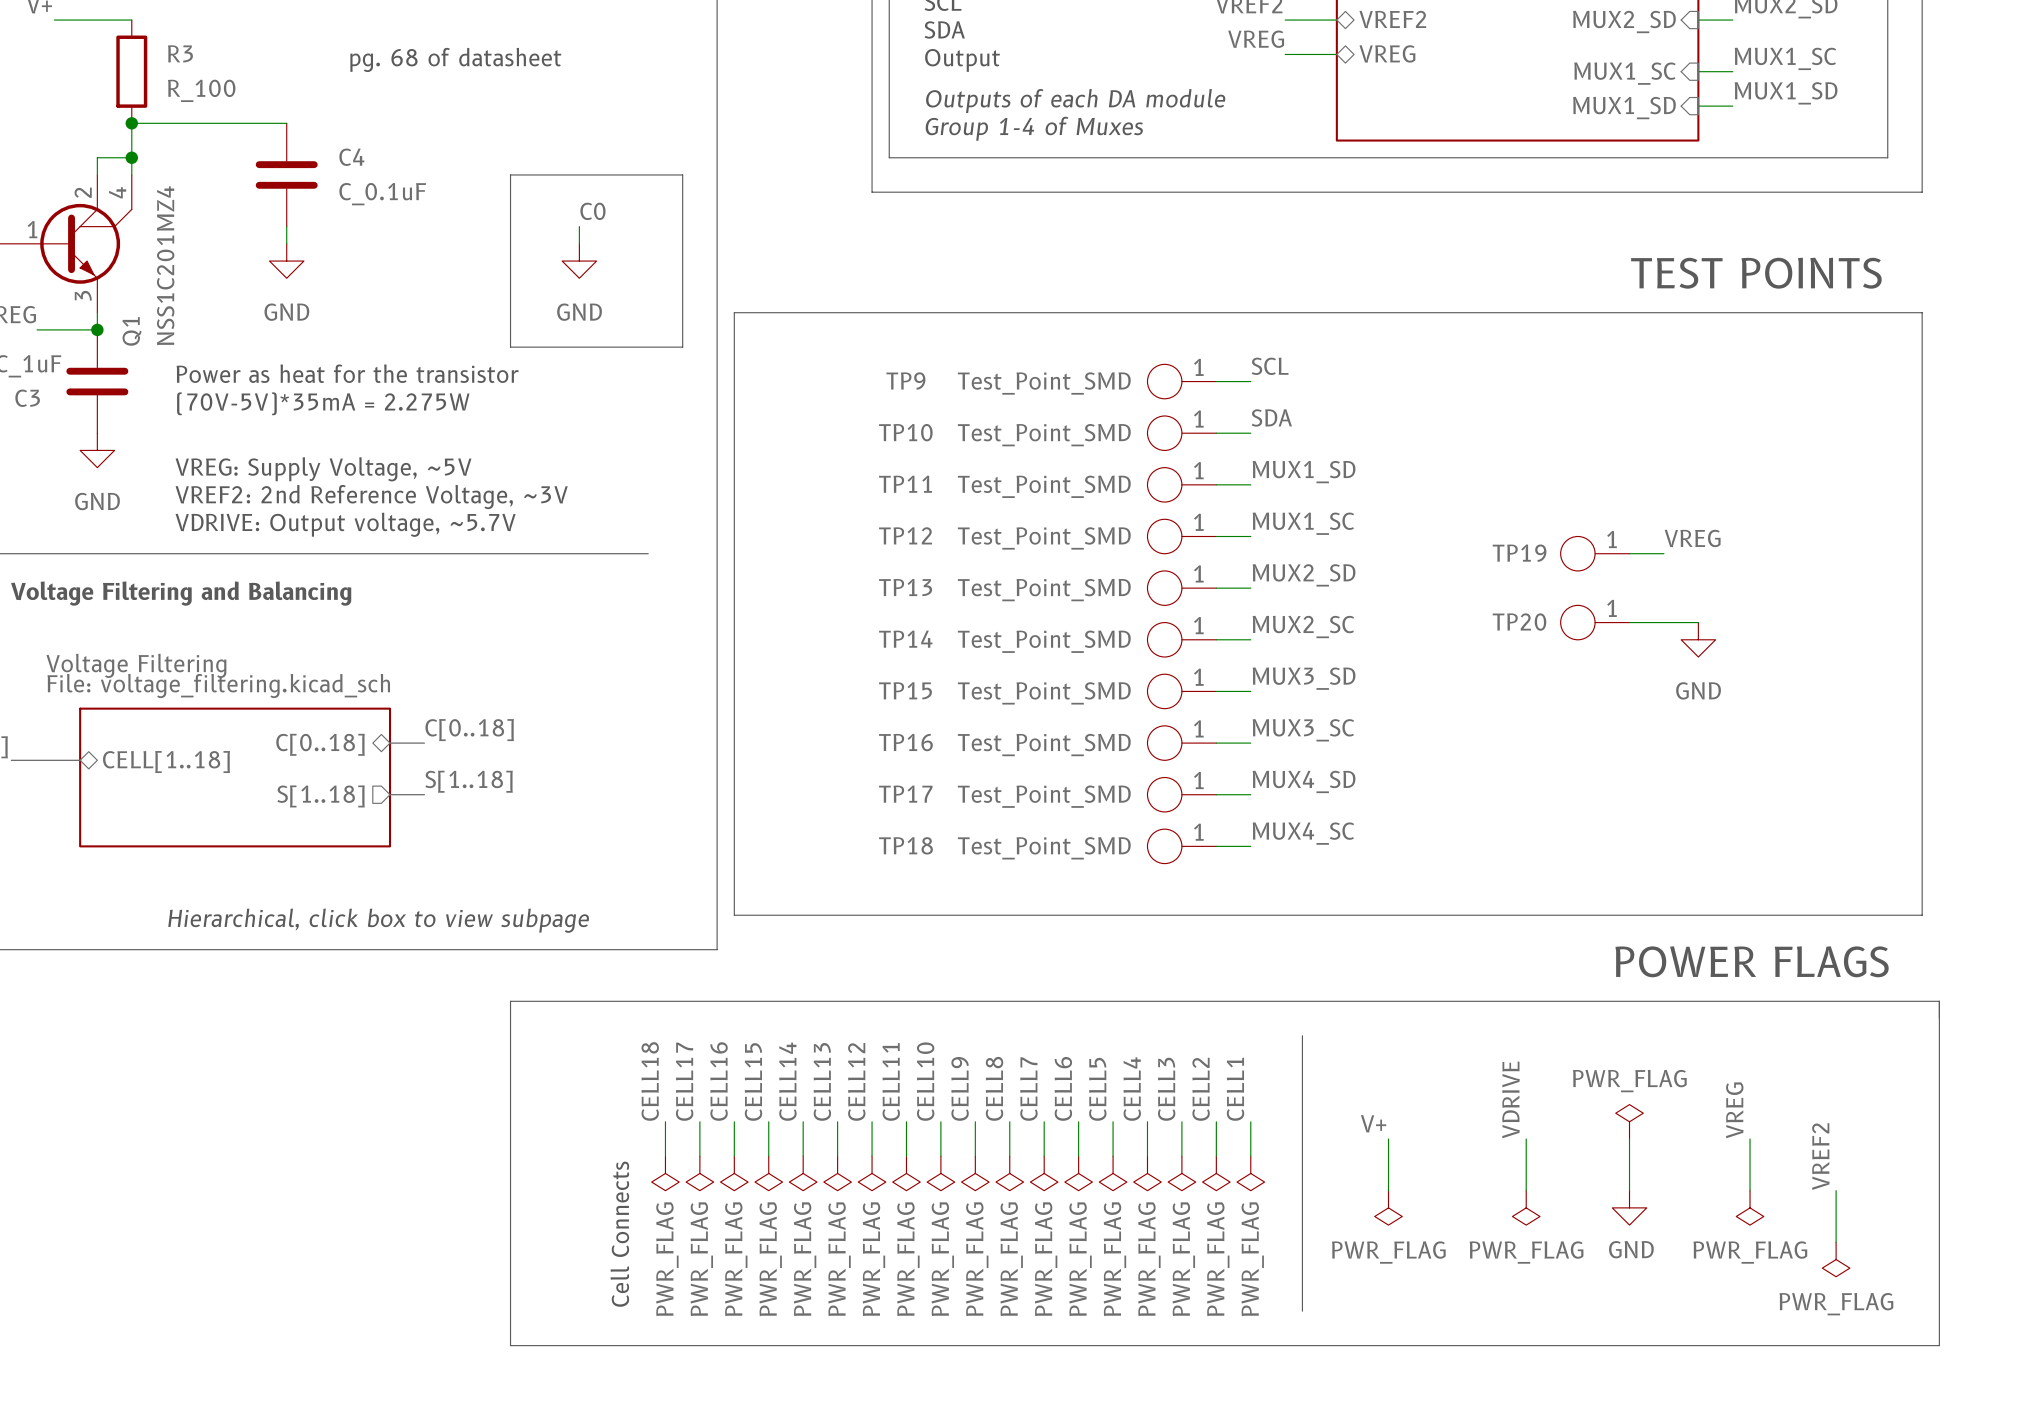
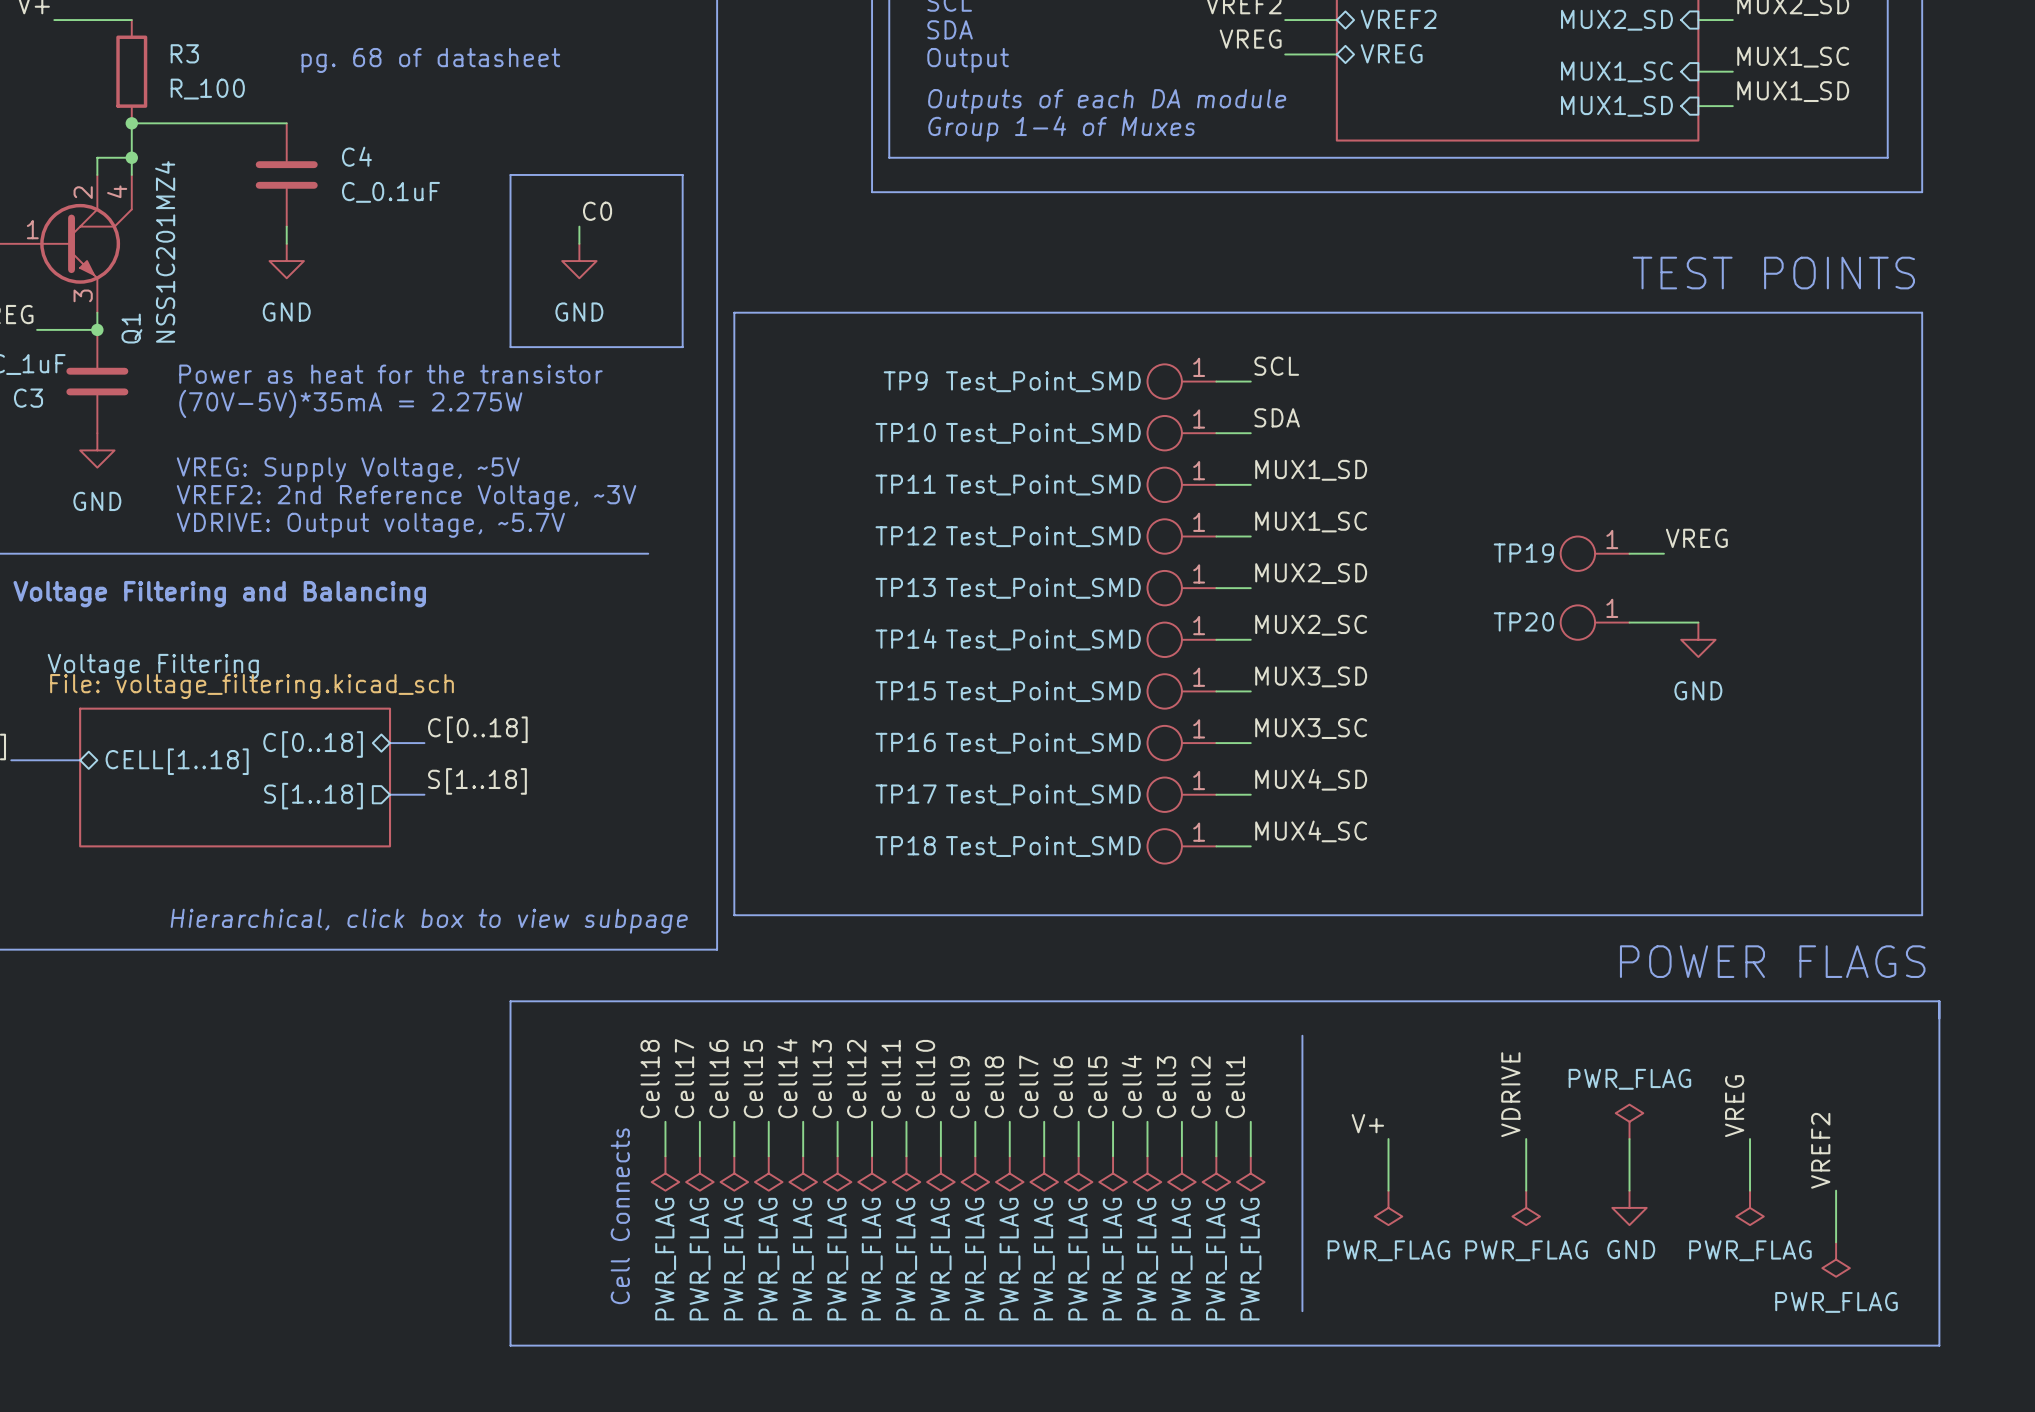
label: CELL18 (650, 1081) -> Cell18 (650, 1079)
label: CELL17 (684, 1081) -> Cell17 (684, 1078)
label: CELL16 (719, 1081) -> Cell16 (718, 1079)
label: CELL15 (753, 1081) -> Cell15 (753, 1079)
label: CELL14 (787, 1081) -> Cell14 (787, 1078)
label: CELL13 (822, 1081) -> Cell13 (822, 1079)
label: CELL12 (856, 1081) -> Cell12 (856, 1079)
label: CELL11 (891, 1081) -> Cell11 (891, 1079)
label: CELL10 (925, 1081) -> Cell10 (925, 1079)
label: CELL9 (960, 1088) -> Cell9 (959, 1087)
label: CELL8 (994, 1088) -> Cell8 (994, 1087)
label: CELL6 (1063, 1088) -> Cell6 (1063, 1087)
label: CELL7 (1028, 1089) -> Cell7 (1028, 1086)
label: CELL5 (1097, 1089) -> Cell5 (1097, 1087)
label: CELL4 (1132, 1089) -> Cell4 (1131, 1086)
label: CELL3 (1166, 1089) -> Cell3 (1166, 1087)
label: CELL2 (1201, 1089) -> Cell2 (1200, 1087)
label: CELL1 (1235, 1089) -> Cell1 (1235, 1087)

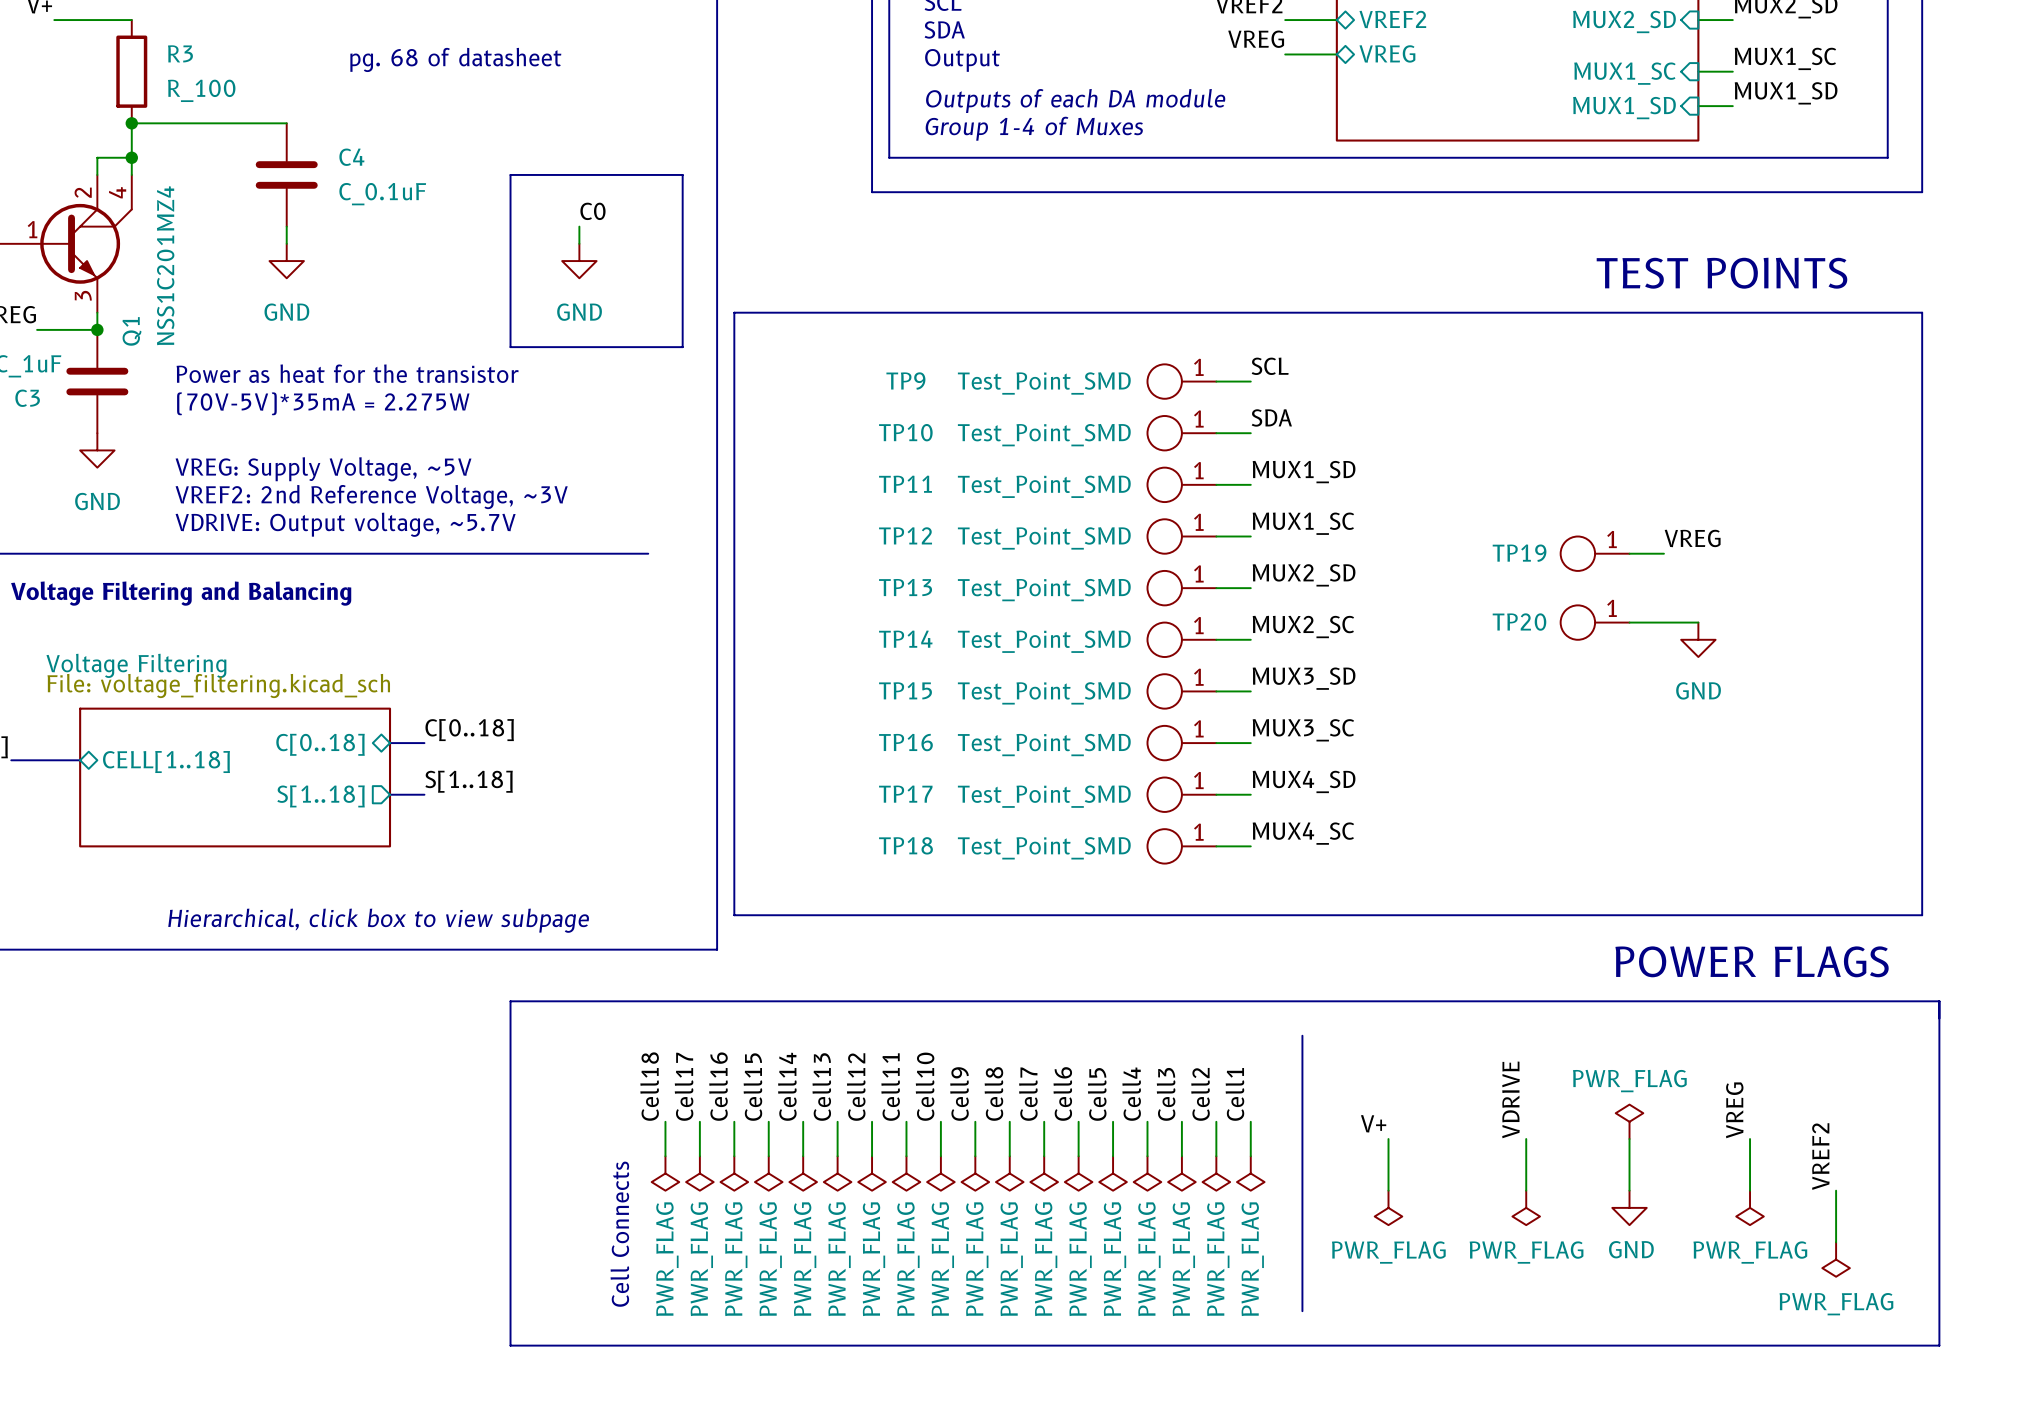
text position: TEST POINTS (1773, 273) -> TEST POINTS (1721, 273)

